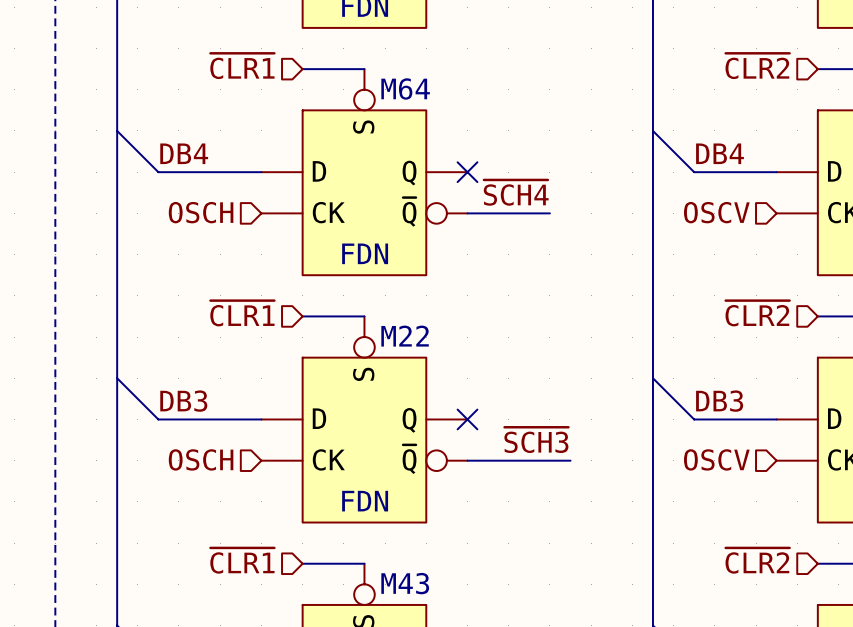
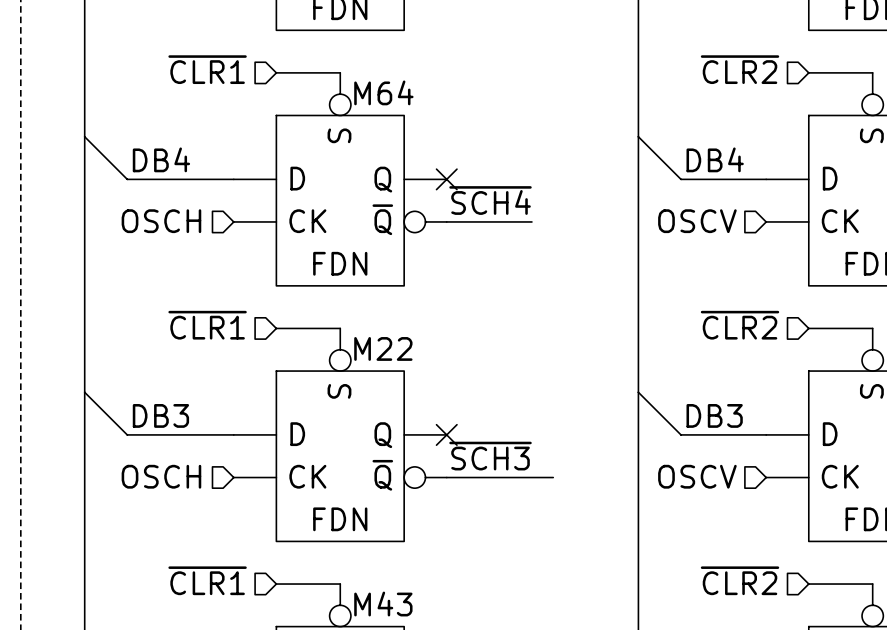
label position: ~{SCH4} (516, 192) -> ~{SCH4} (490, 200)
label position: ~{SCH3} (536, 440) -> ~{SCH3} (490, 456)

